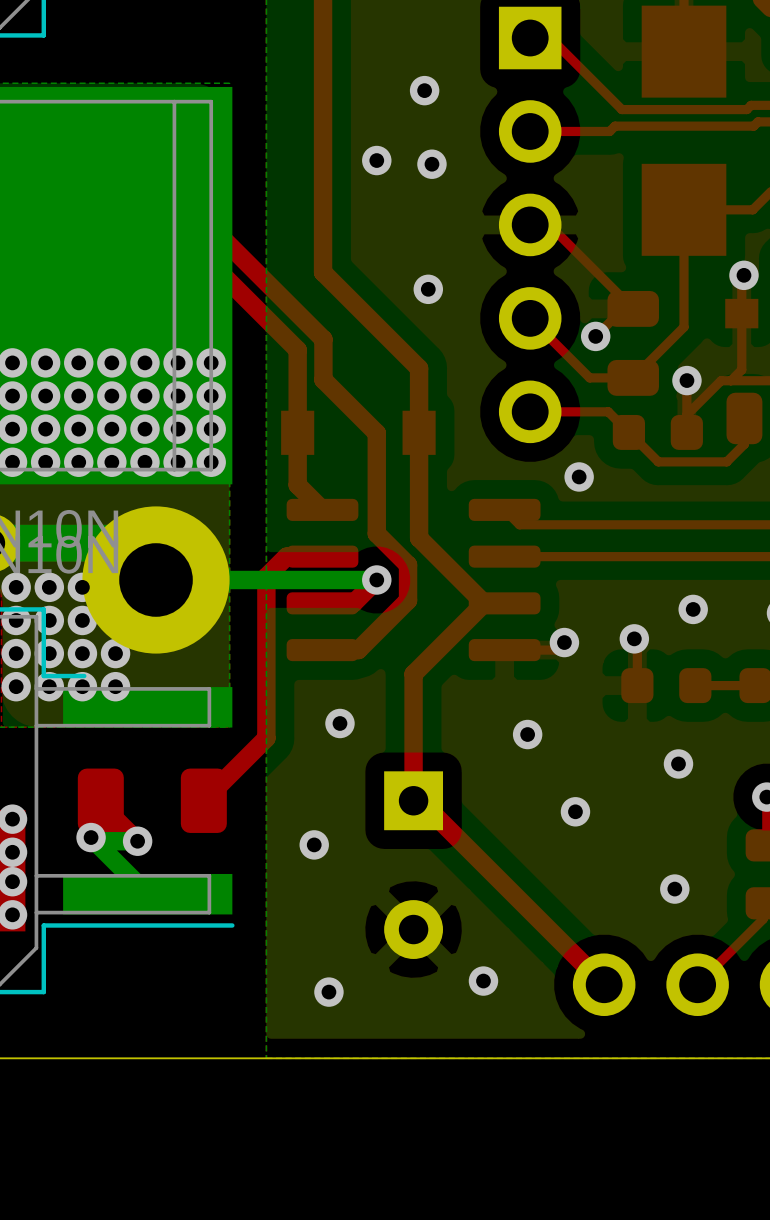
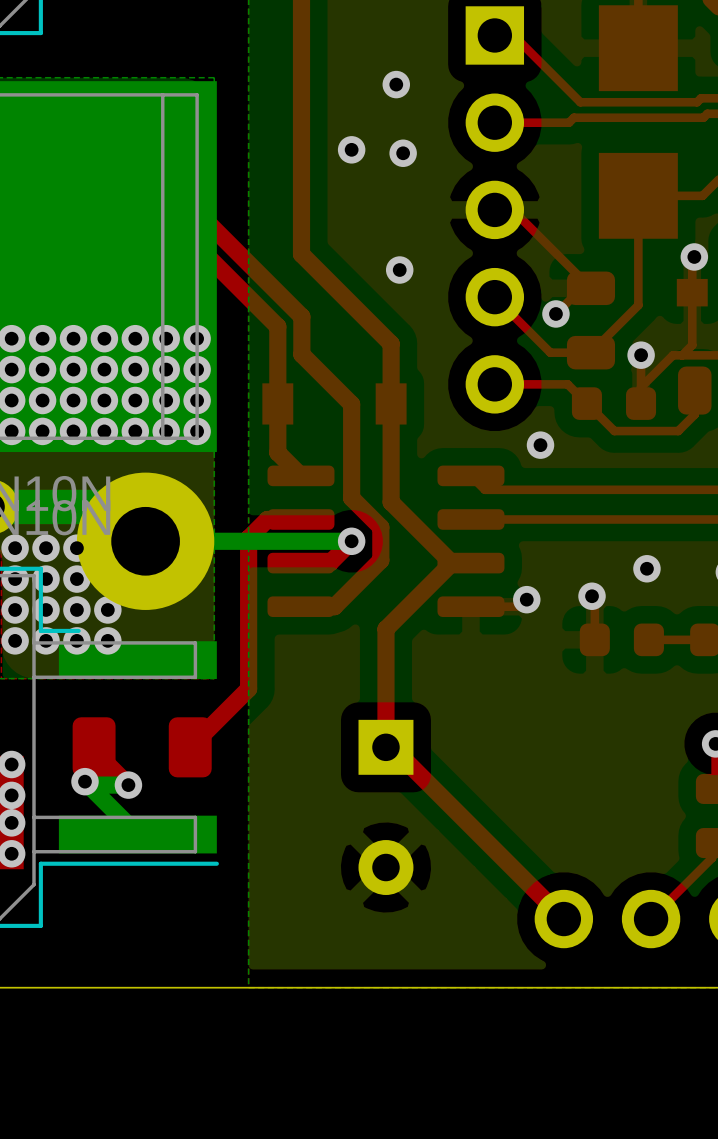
via: (339, 723) -> none
via: (527, 734) -> none
via: (678, 763) -> none
via: (575, 811) -> none
via: (314, 844) -> none
via: (674, 889) -> none
via: (483, 981) -> none
via: (328, 992) -> none

